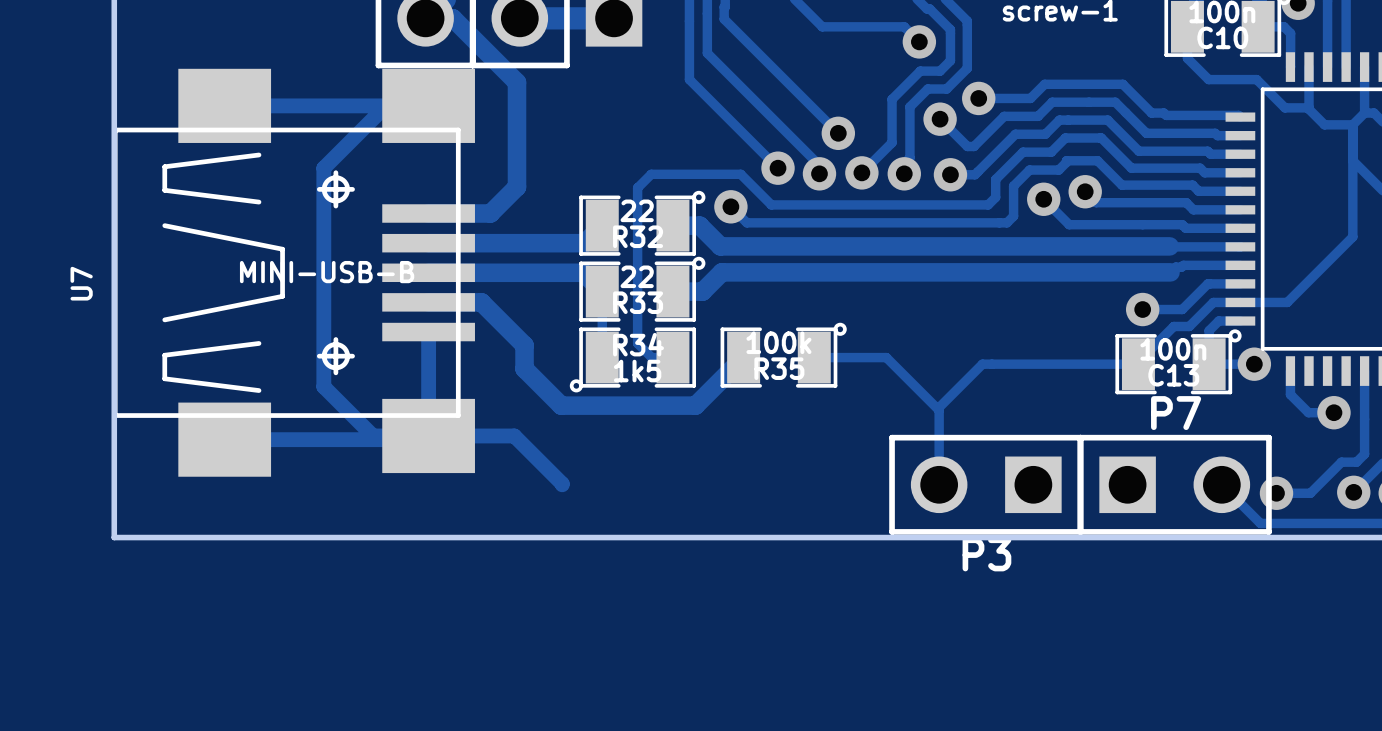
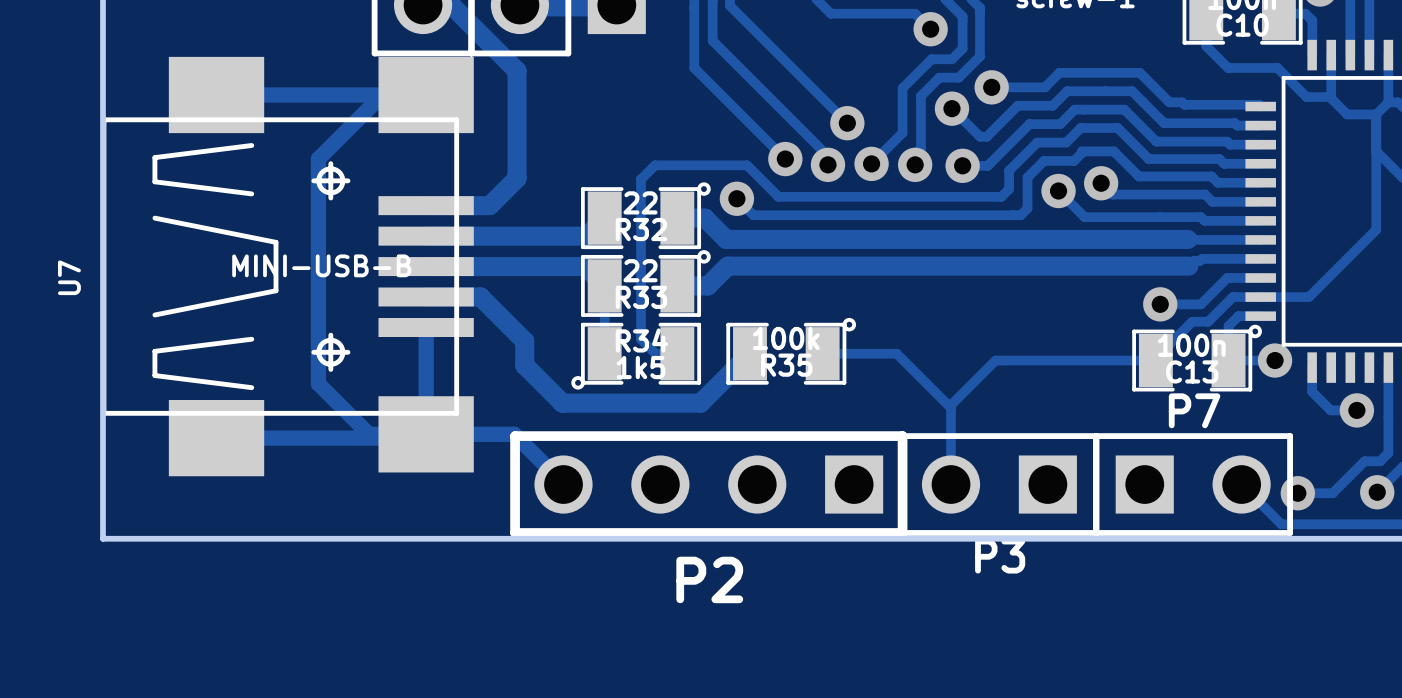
P2: none -> (708, 484)

